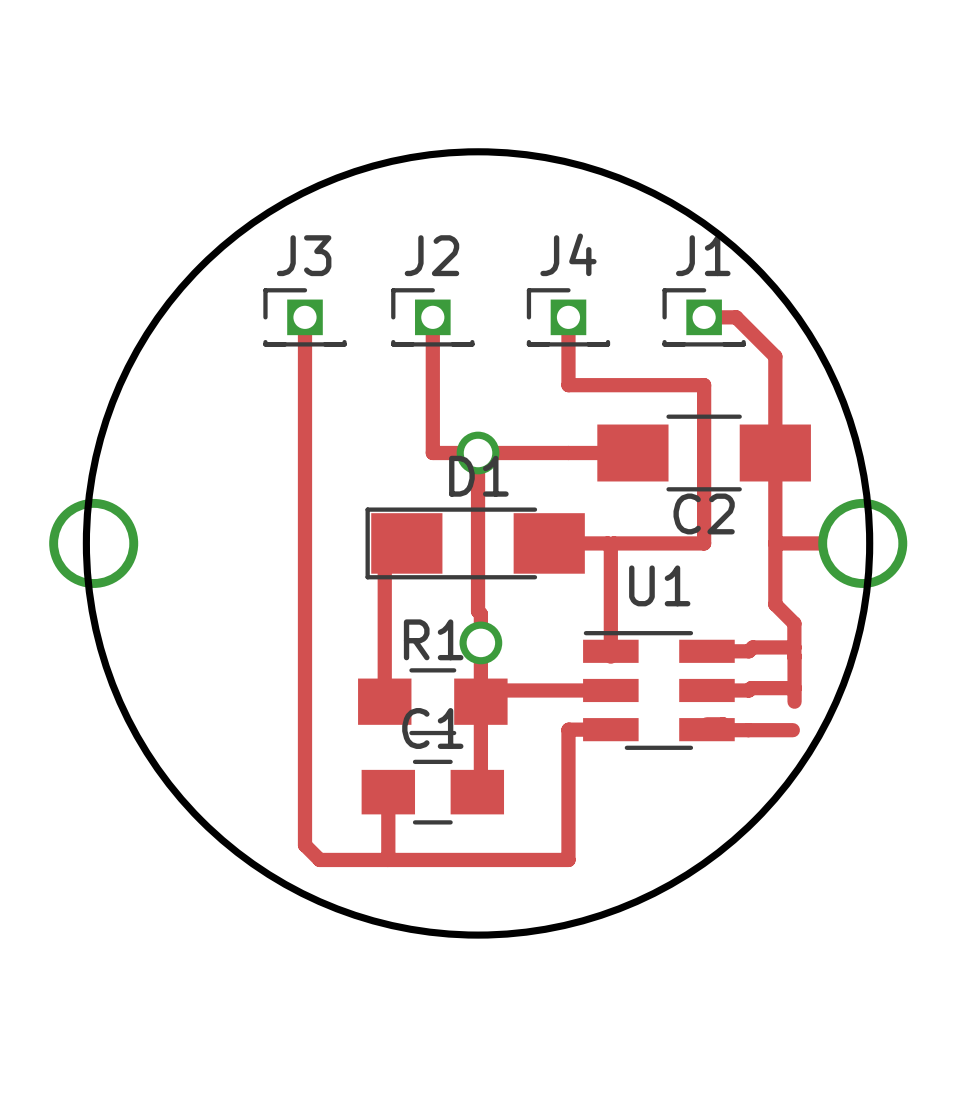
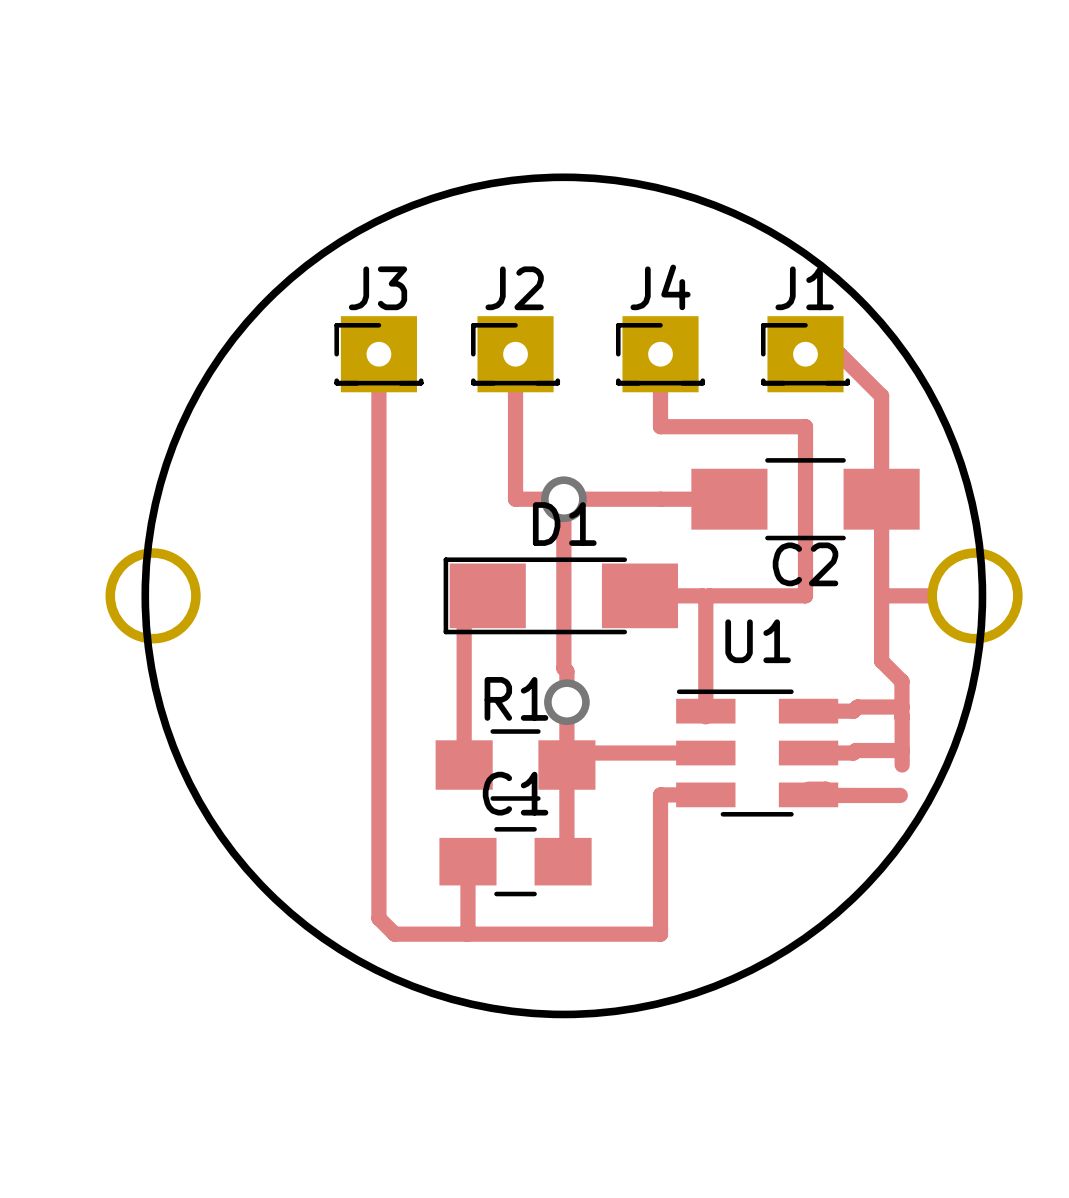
J3 footprint: [263, 288, 347, 347] -> [334, 316, 424, 393]
J2 footprint: [391, 288, 475, 347] -> [471, 316, 561, 393]
J4 footprint: [526, 288, 611, 347] -> [616, 316, 706, 393]
J1 footprint: [662, 288, 746, 347] -> [760, 316, 851, 393]

